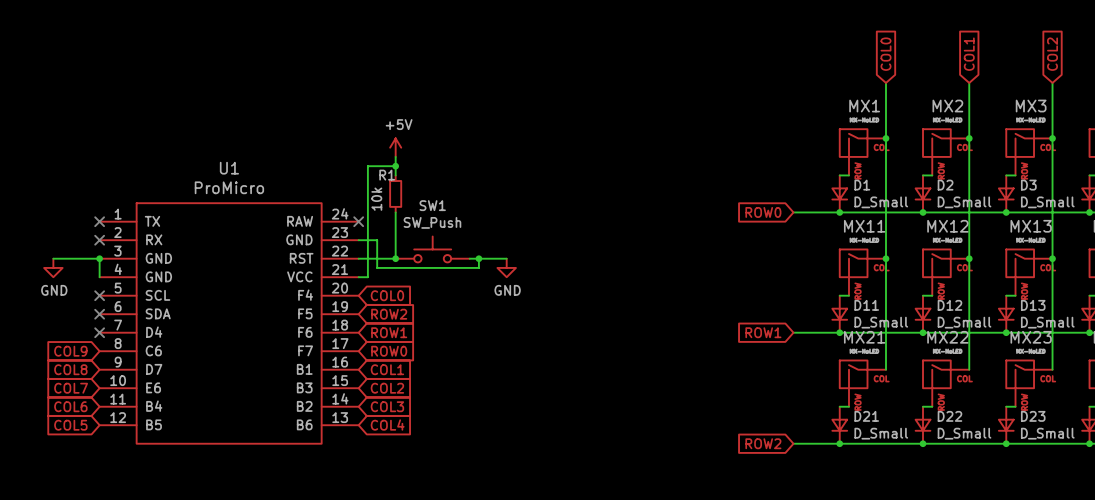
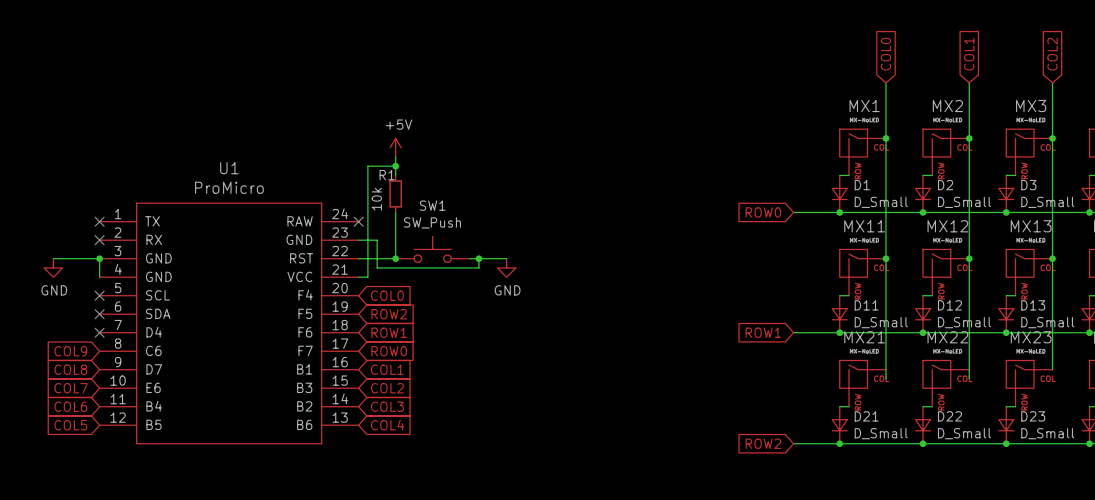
wire: none -> (886, 369) (886, 378)
wire: none -> (969, 369) (969, 378)

